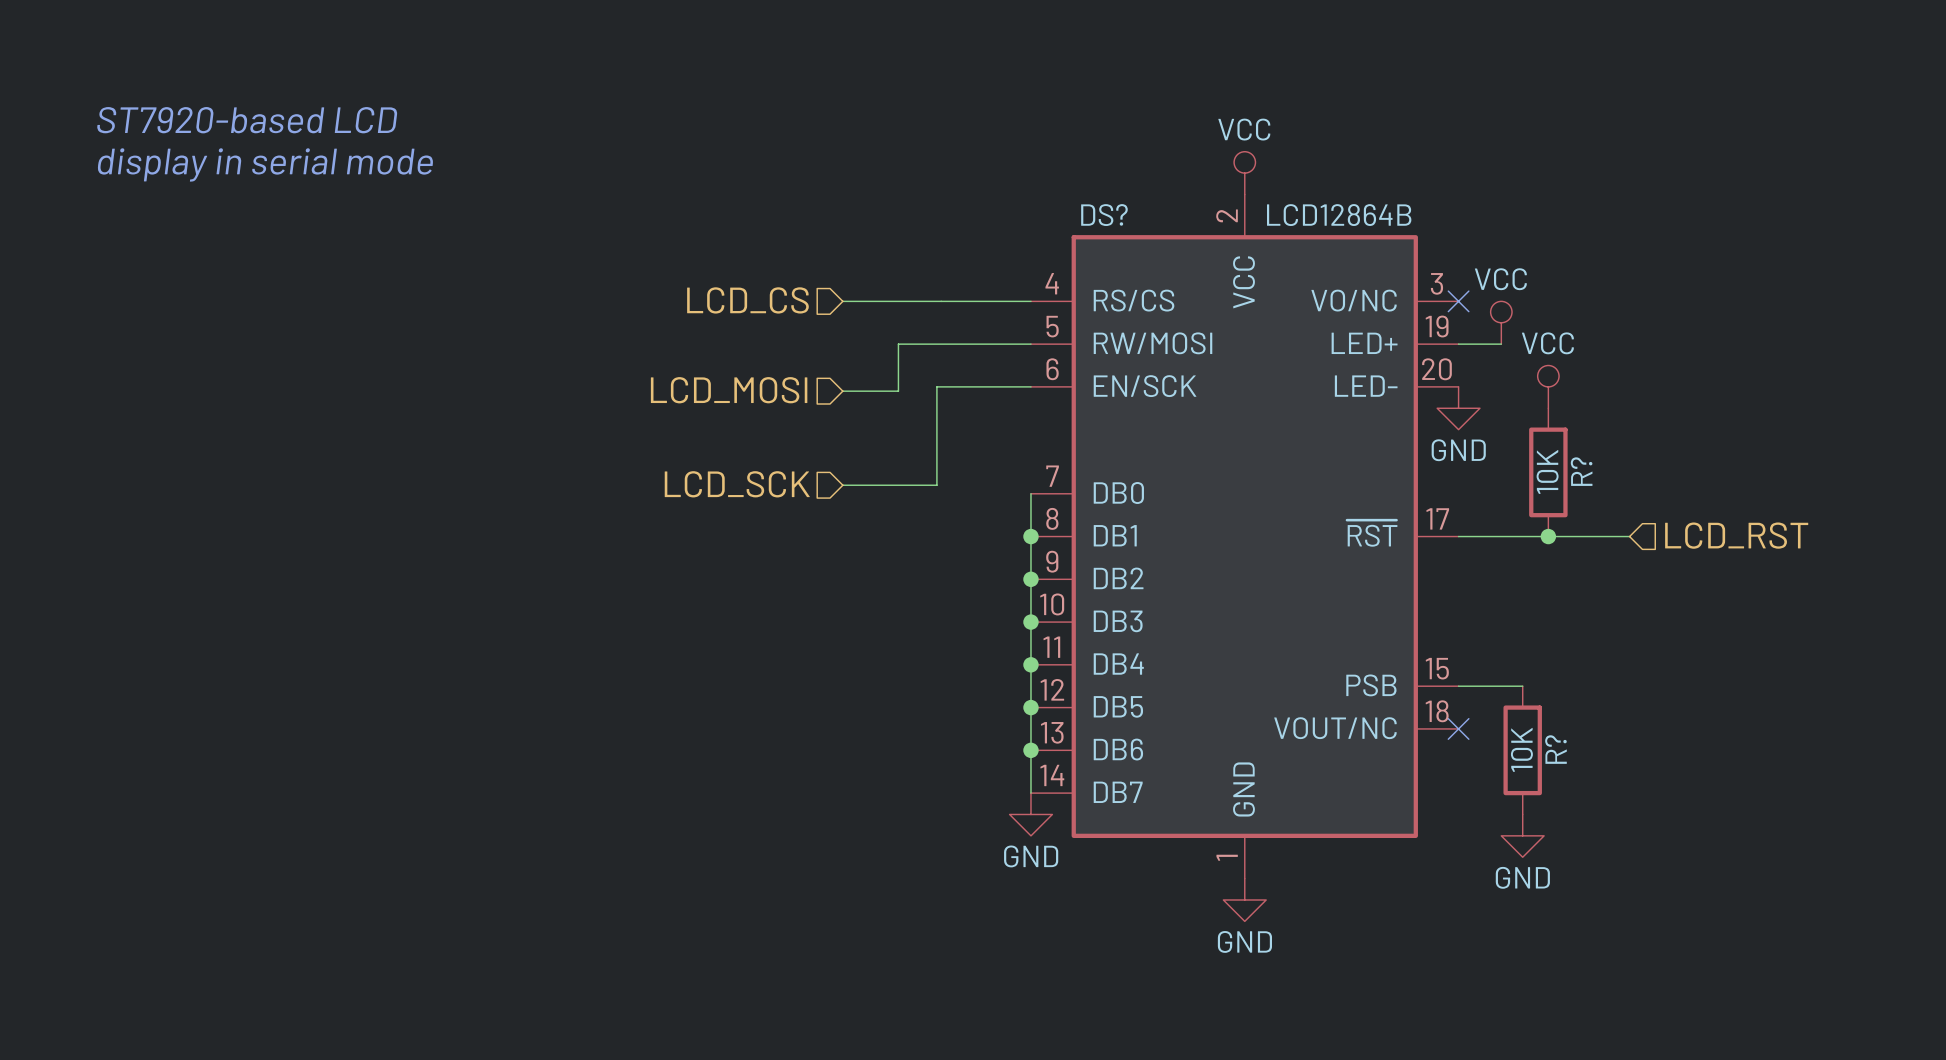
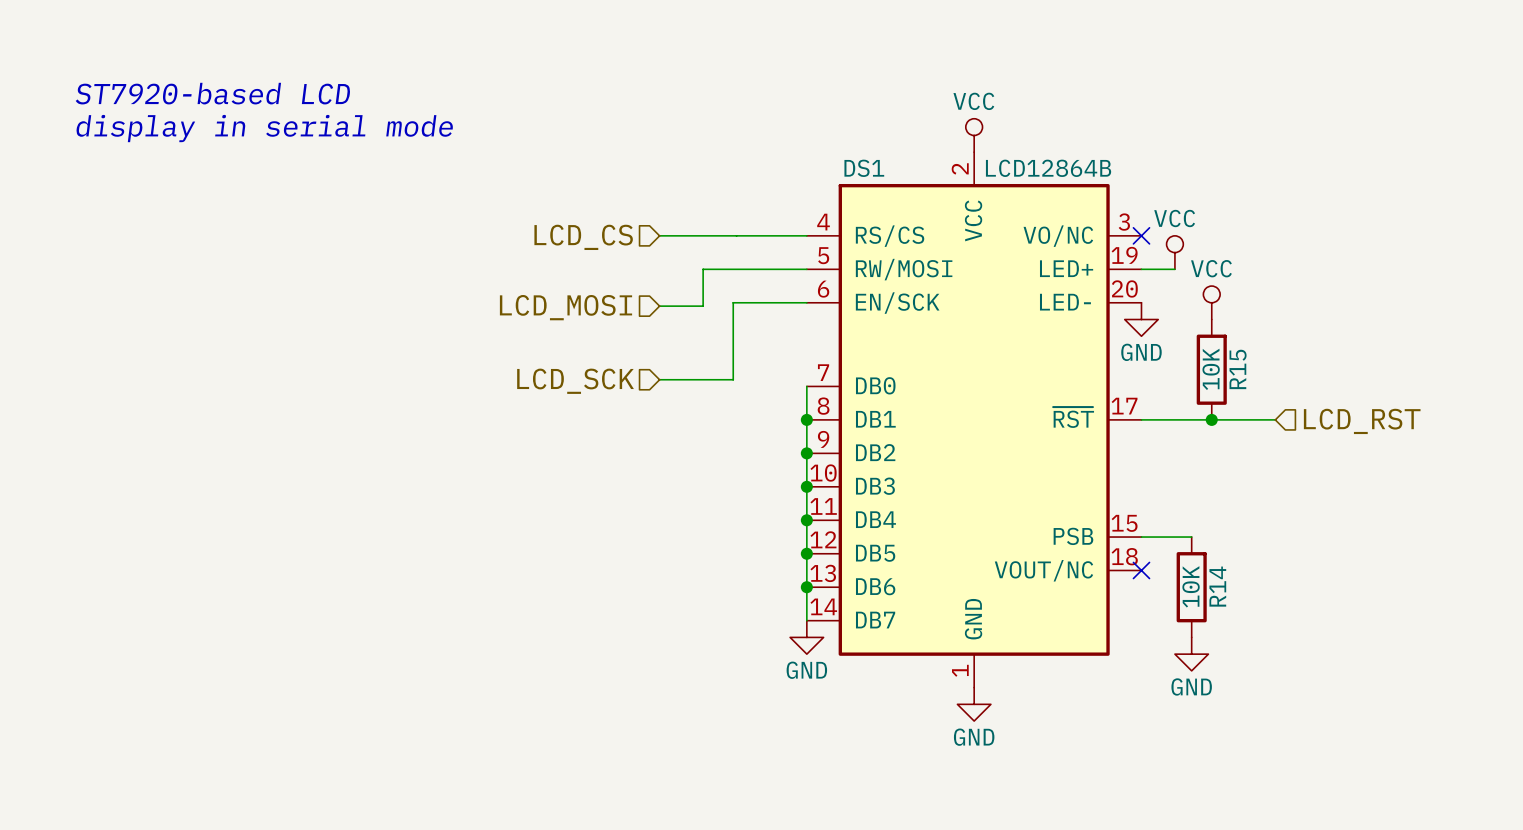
DS? name: DS? (1104, 215) -> DS1 (864, 168)
R? name: R? (1581, 471) -> R15 (1238, 369)
R? name: R? (1555, 749) -> R14 (1217, 586)

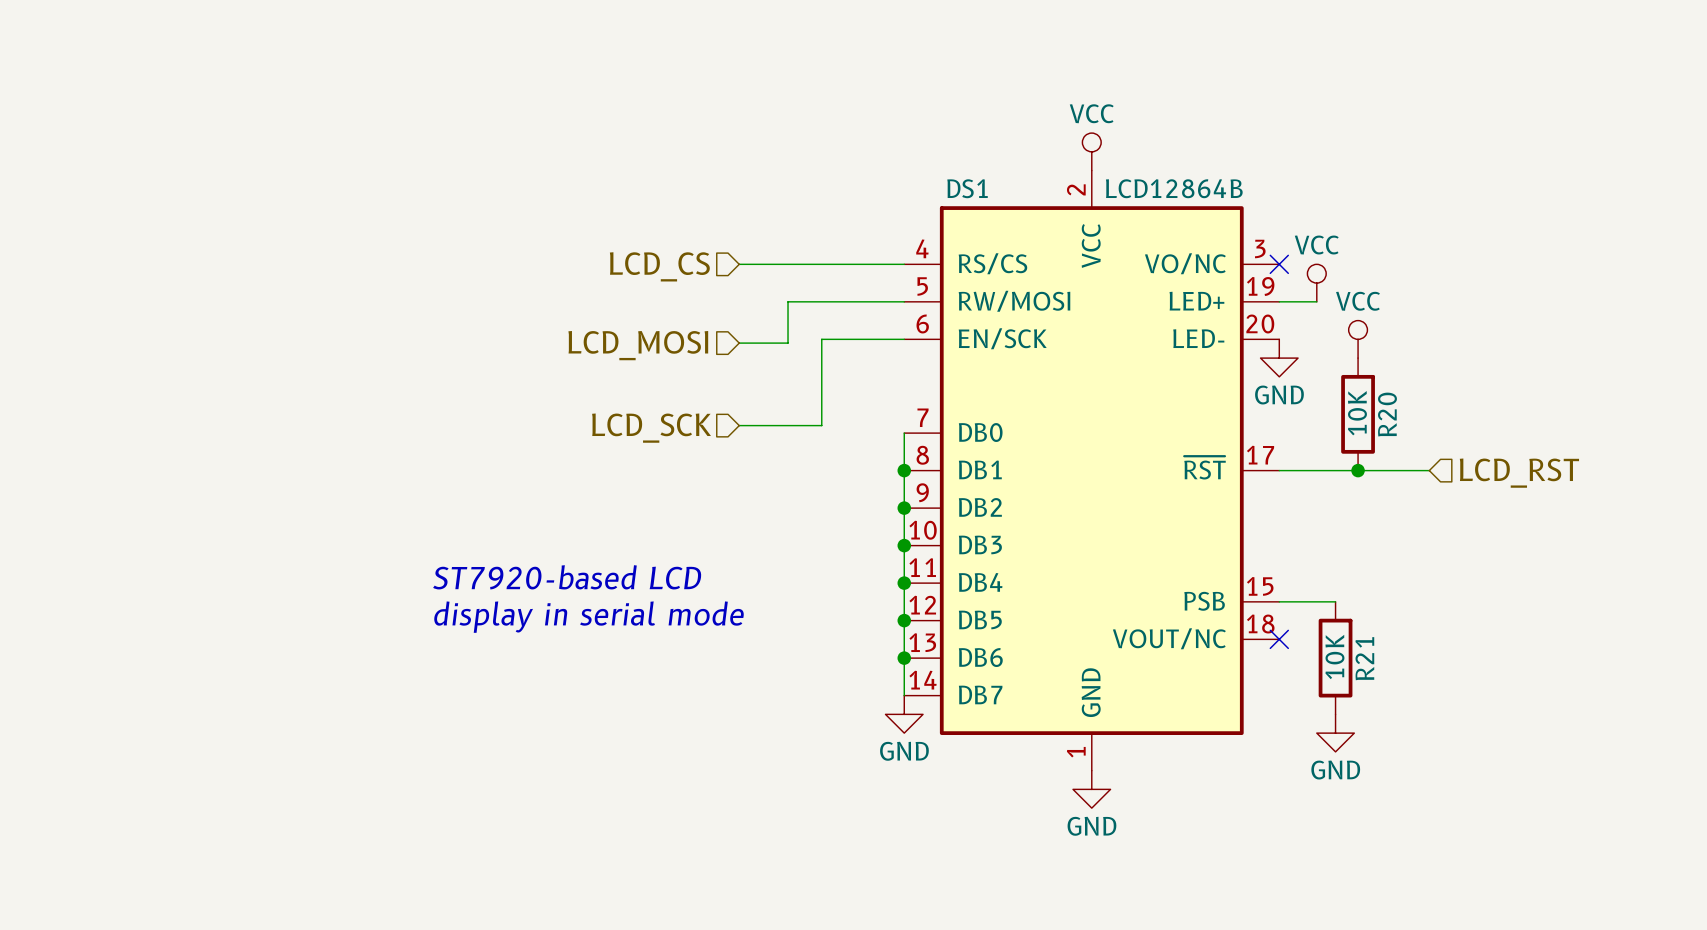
text: ST7920-based LCD (213, 93) -> none
text: display in serial mode (264, 128) -> none
R15 name: R15 (1238, 369) -> R20 (1387, 414)
text: none -> ST7920-based LCD (567, 577)
text: none -> display in serial mode (588, 617)
R14 name: R14 (1217, 586) -> R21 (1364, 658)

